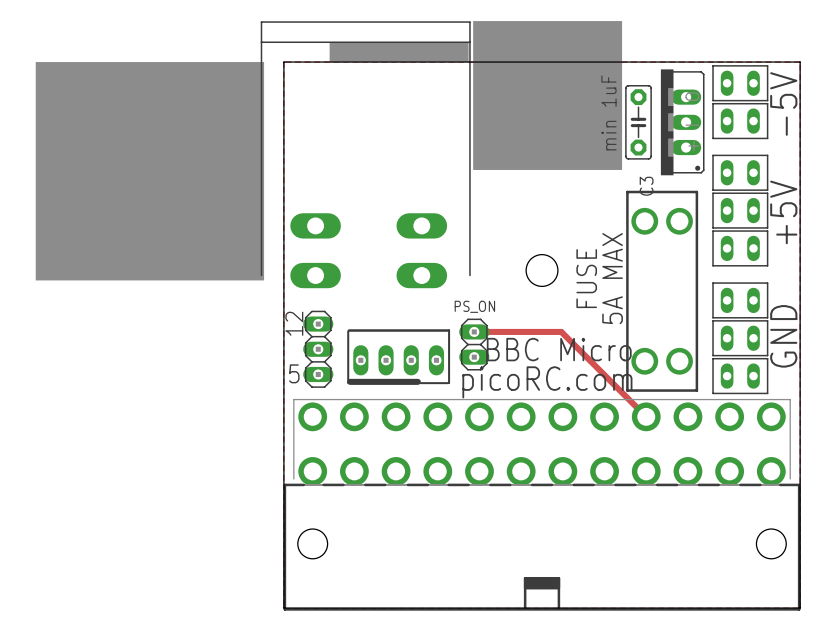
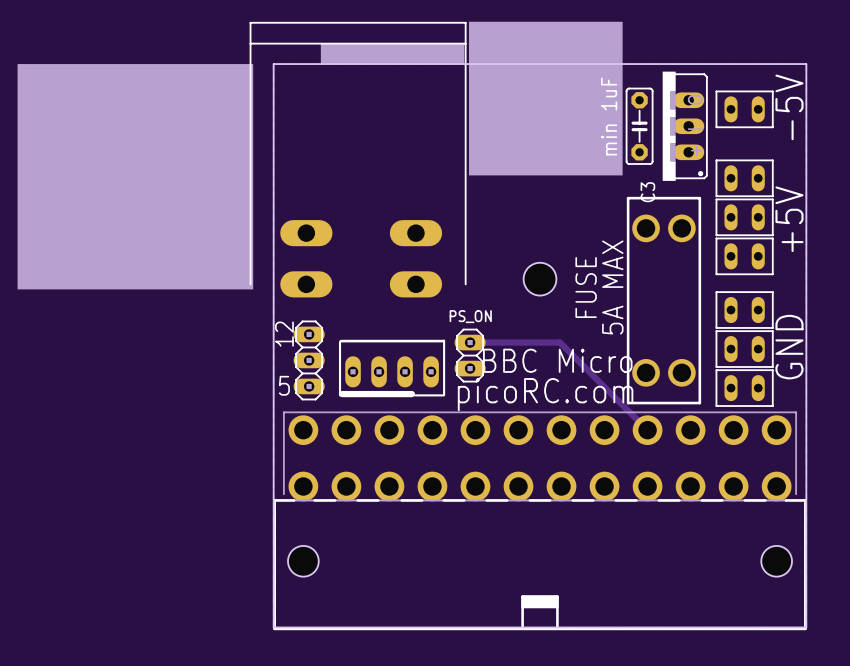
part: (740, 83) -> none
part: none -> (744, 109)
part: (740, 121) -> none

